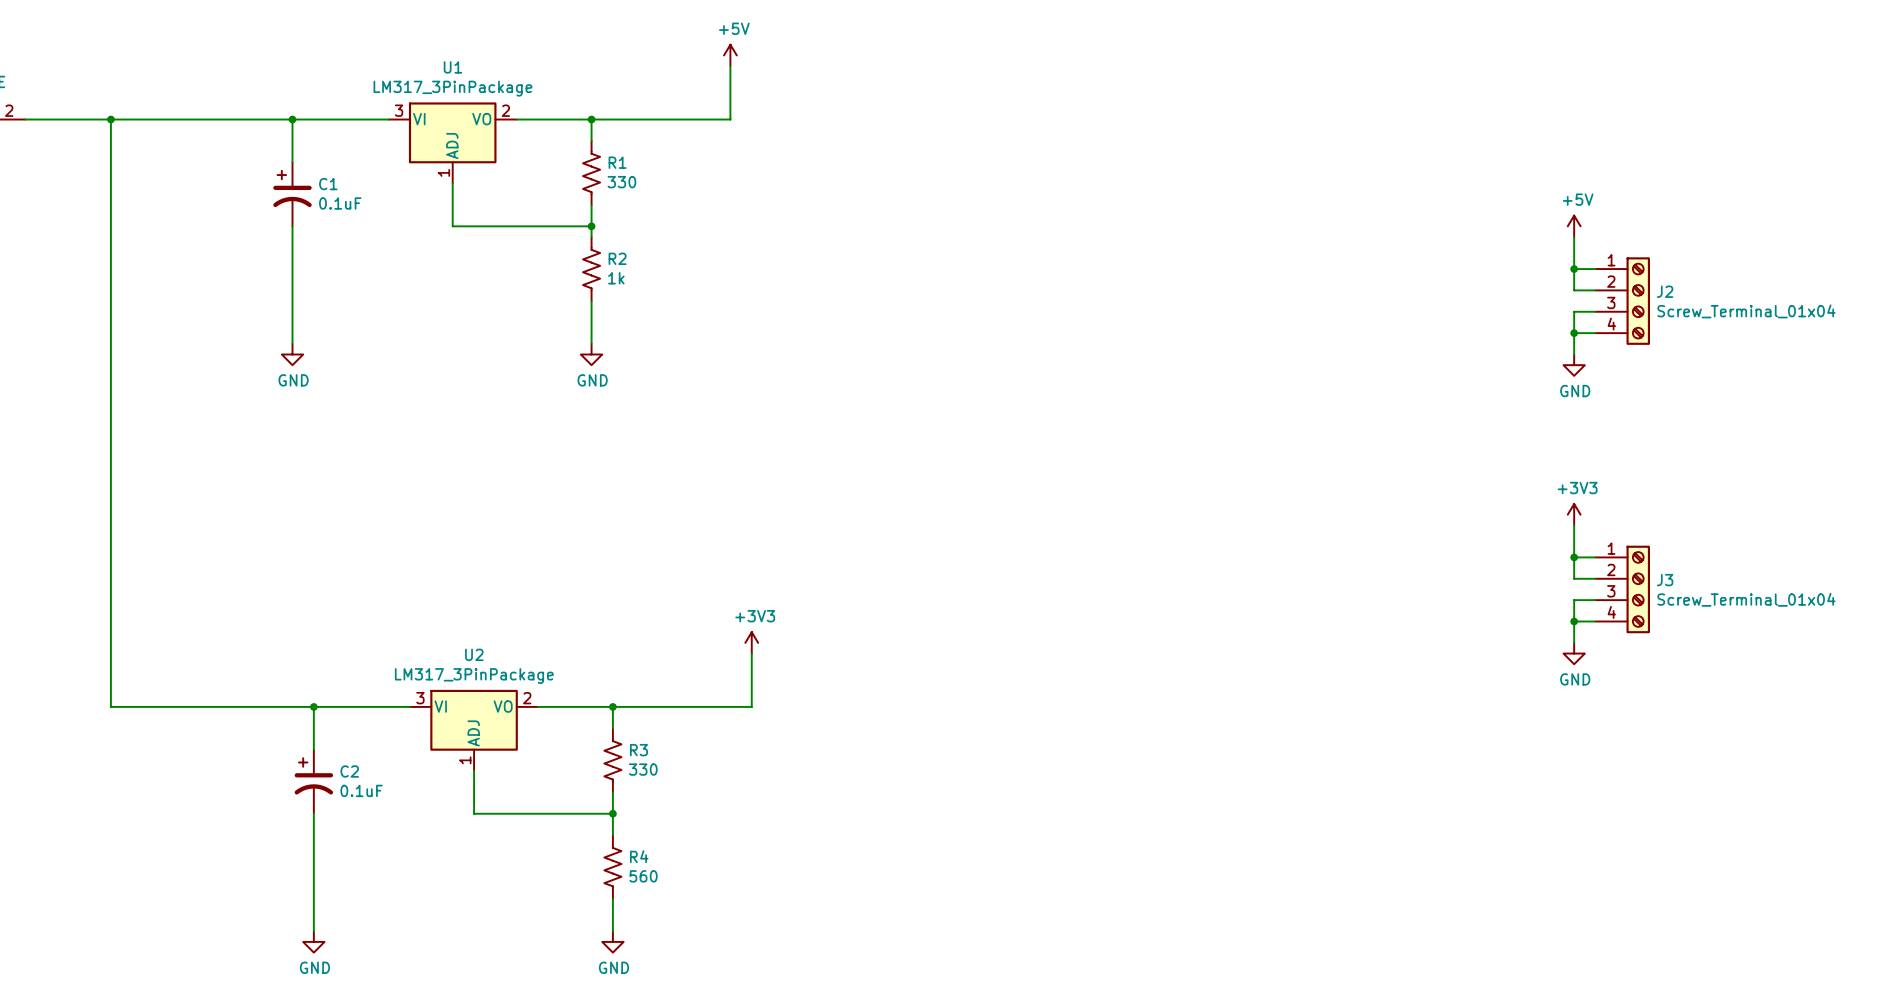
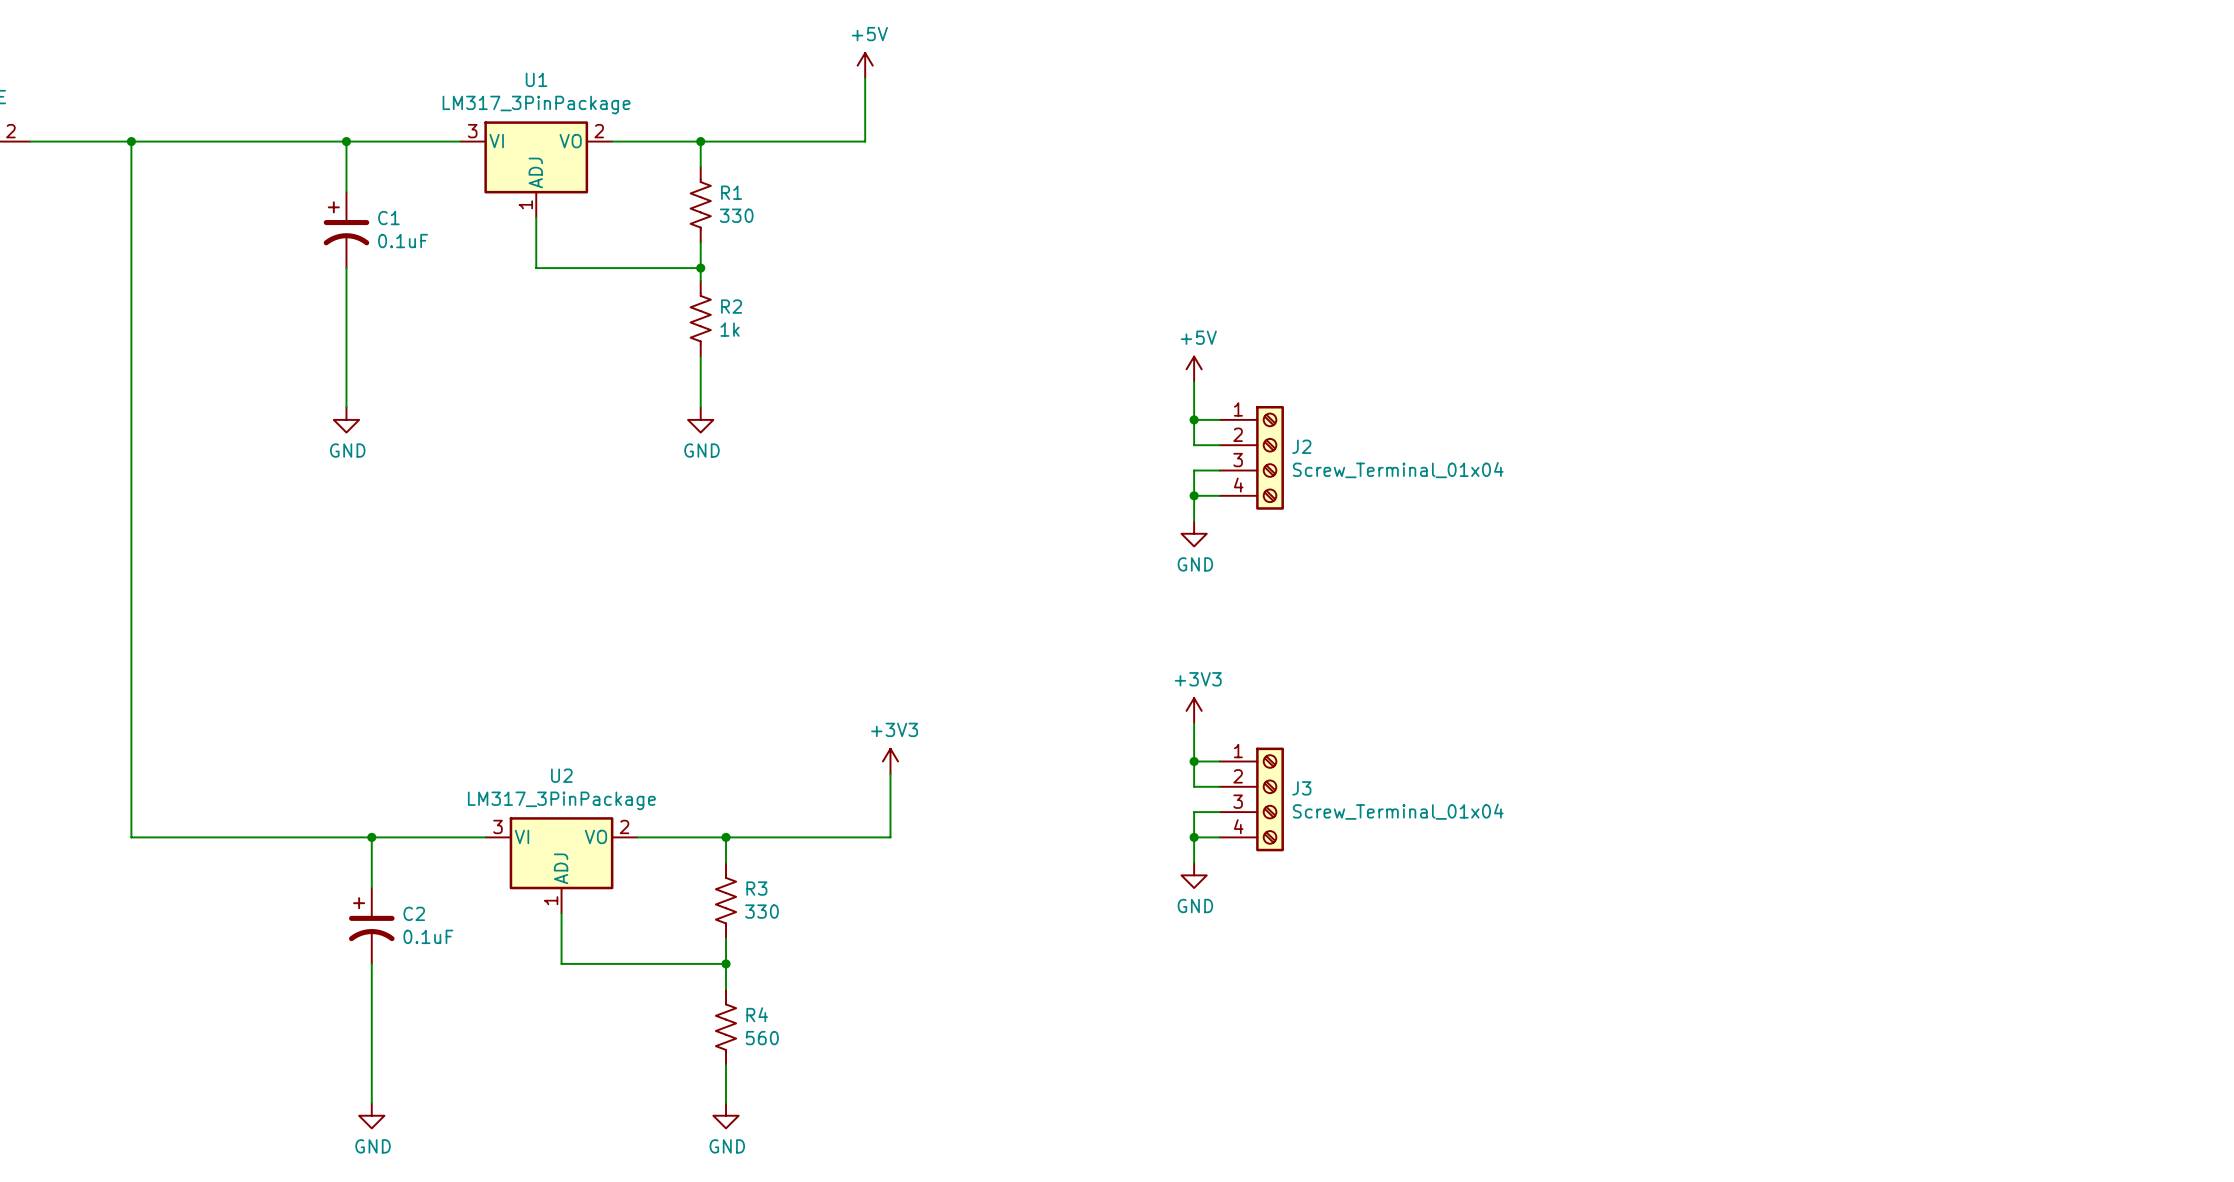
power symbol: +5V (1574, 226) -> none
wire: (1574, 237) (1574, 290) (1595, 290) -> none
wire: (1574, 269) (1595, 269) -> none
junction: (1574, 269) -> none
J2 position: (1622, 301) -> (1251, 457)
power symbol: none -> +5V (1194, 369)
wire: (1595, 311) (1574, 311) (1574, 354) -> none
wire: none -> (1194, 381) (1194, 445) (1219, 445)
wire: (1574, 333) (1595, 333) -> none
junction: (1574, 333) -> none
wire: none -> (1194, 419) (1219, 419)
junction: none -> (1194, 419)
power symbol: GND (1574, 365) -> none
wire: none -> (1219, 470) (1194, 470) (1194, 521)
wire: none -> (1194, 495) (1219, 495)
junction: none -> (1194, 495)
power symbol: none -> GND (1194, 533)
power symbol: +3V3 (1574, 514) -> none
wire: (1574, 525) (1574, 578) (1595, 578) -> none
wire: (1574, 557) (1595, 557) -> none
junction: (1574, 557) -> none
J3 position: (1622, 589) -> (1251, 799)
power symbol: none -> +3V3 (1194, 710)
wire: (1595, 600) (1574, 600) (1574, 642) -> none
wire: none -> (1194, 723) (1194, 786) (1219, 786)
wire: (1574, 621) (1595, 621) -> none
junction: (1574, 621) -> none
wire: none -> (1194, 761) (1219, 761)
junction: none -> (1194, 761)
power symbol: GND (1574, 653) -> none
wire: none -> (1219, 812) (1194, 812) (1194, 862)
wire: none -> (1194, 837) (1219, 837)
junction: none -> (1194, 837)
power symbol: none -> GND (1194, 875)

